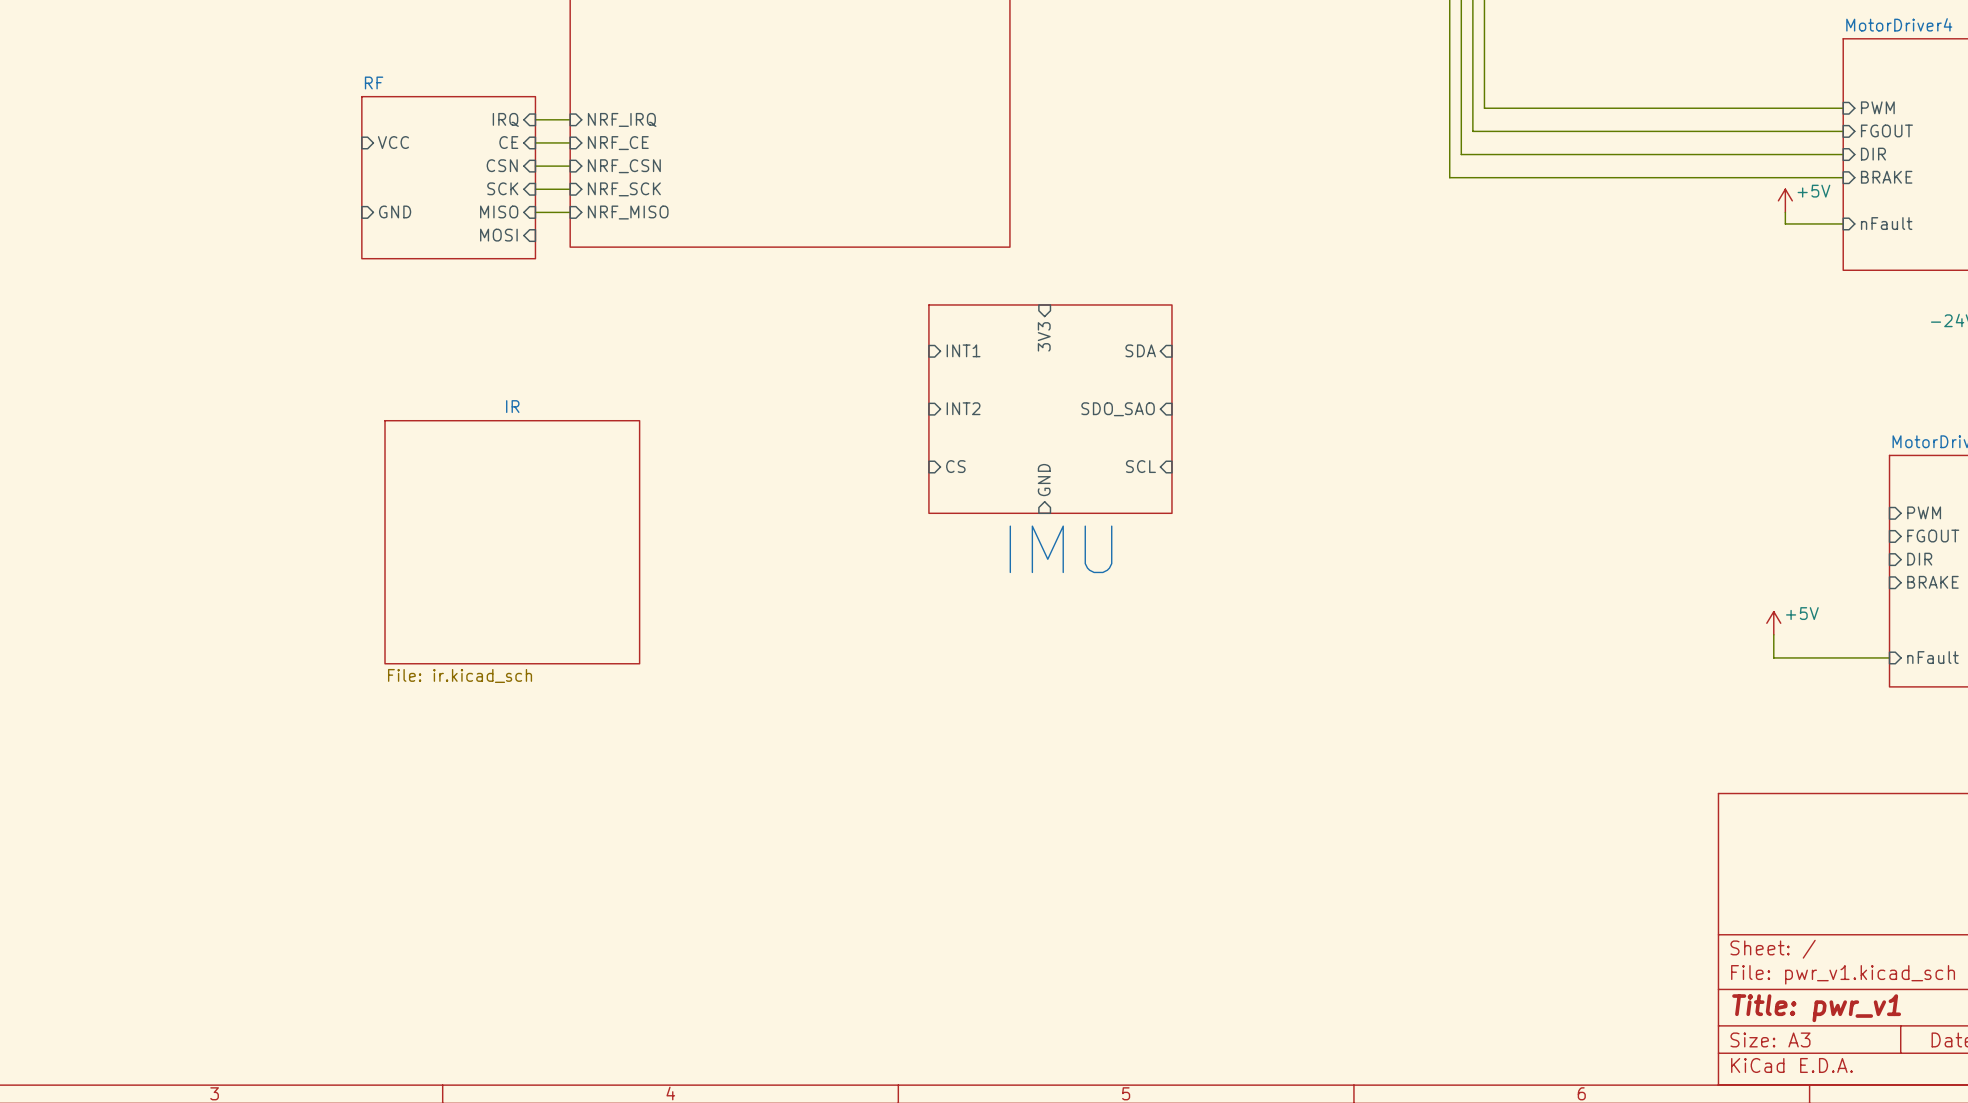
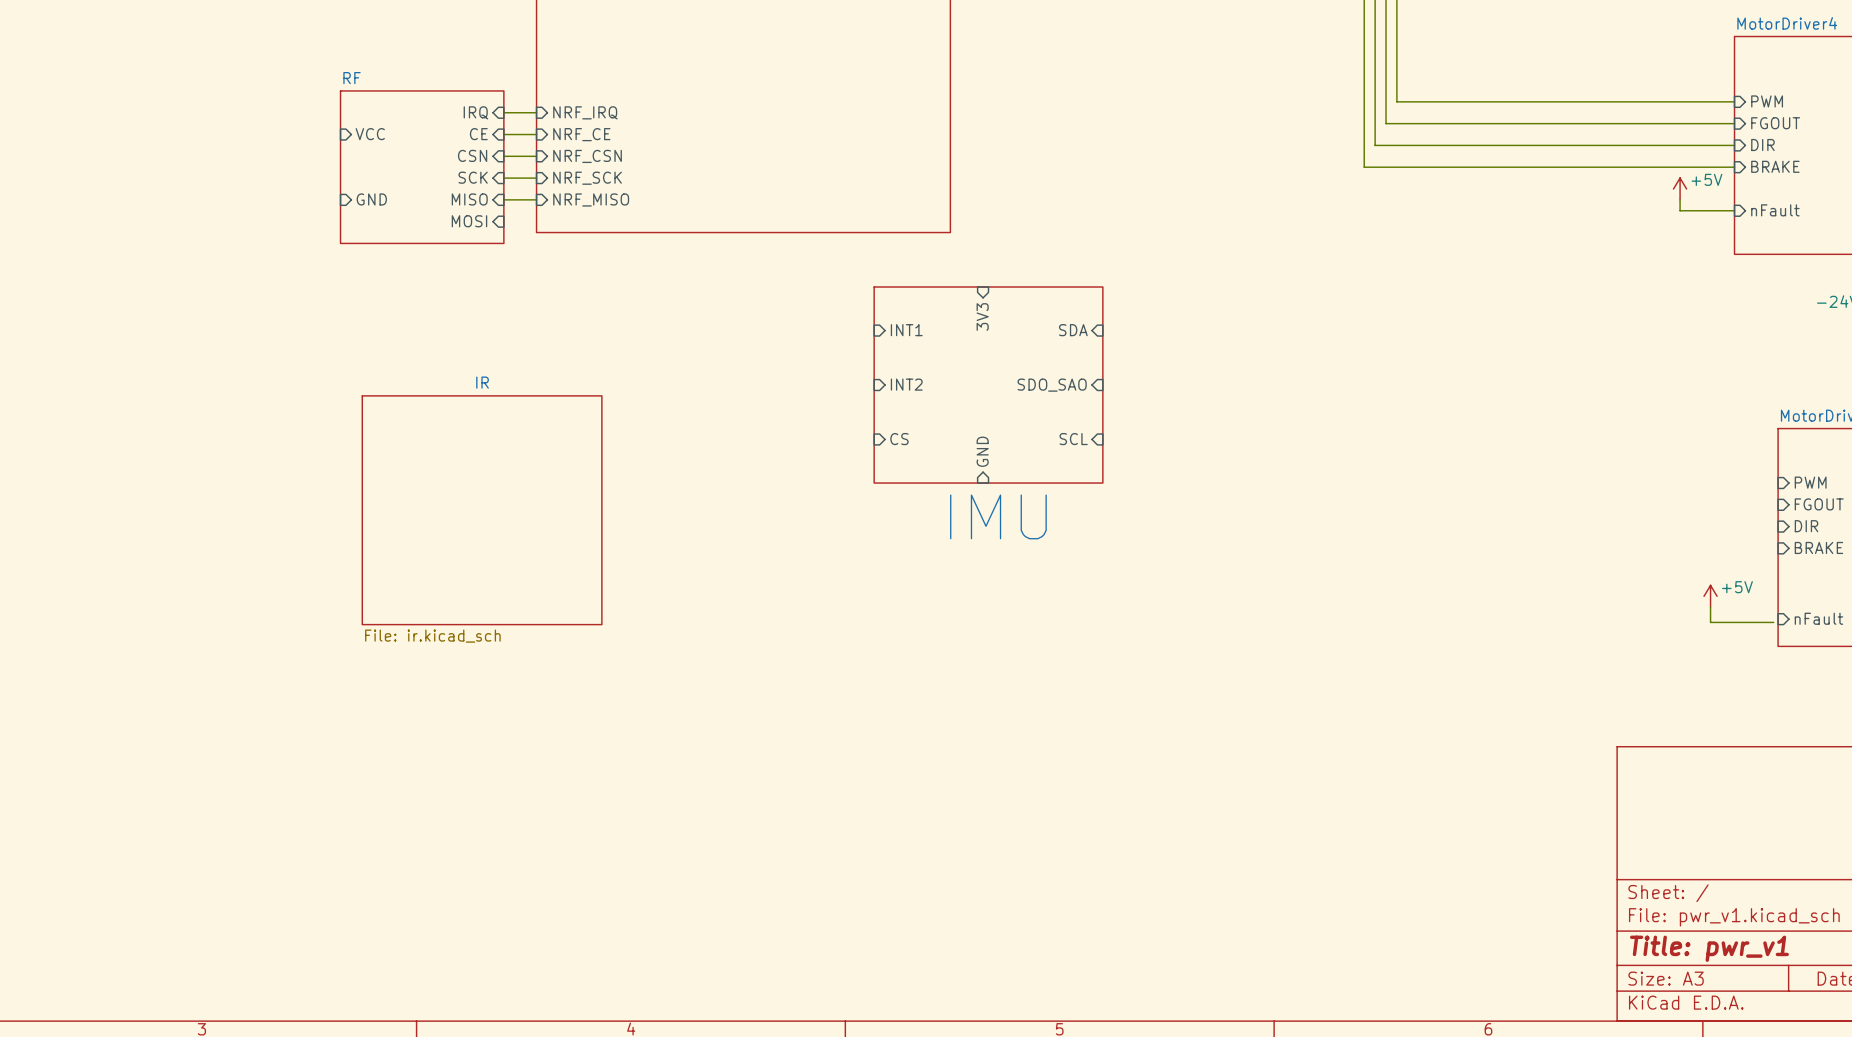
power symbol position: +5V (1773, 623) -> +5V (1710, 596)
wire: (1773, 634) (1773, 657) (1889, 657) -> none
wire: none -> (1710, 607) (1710, 622) (1773, 622)

